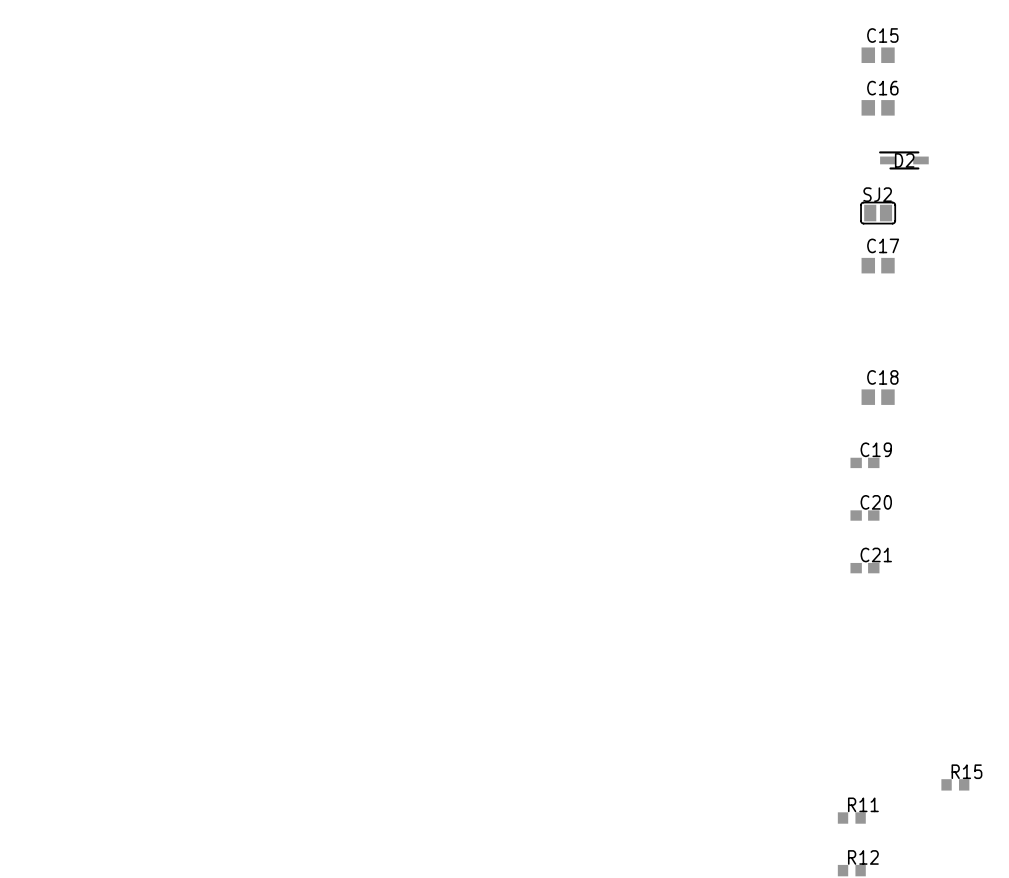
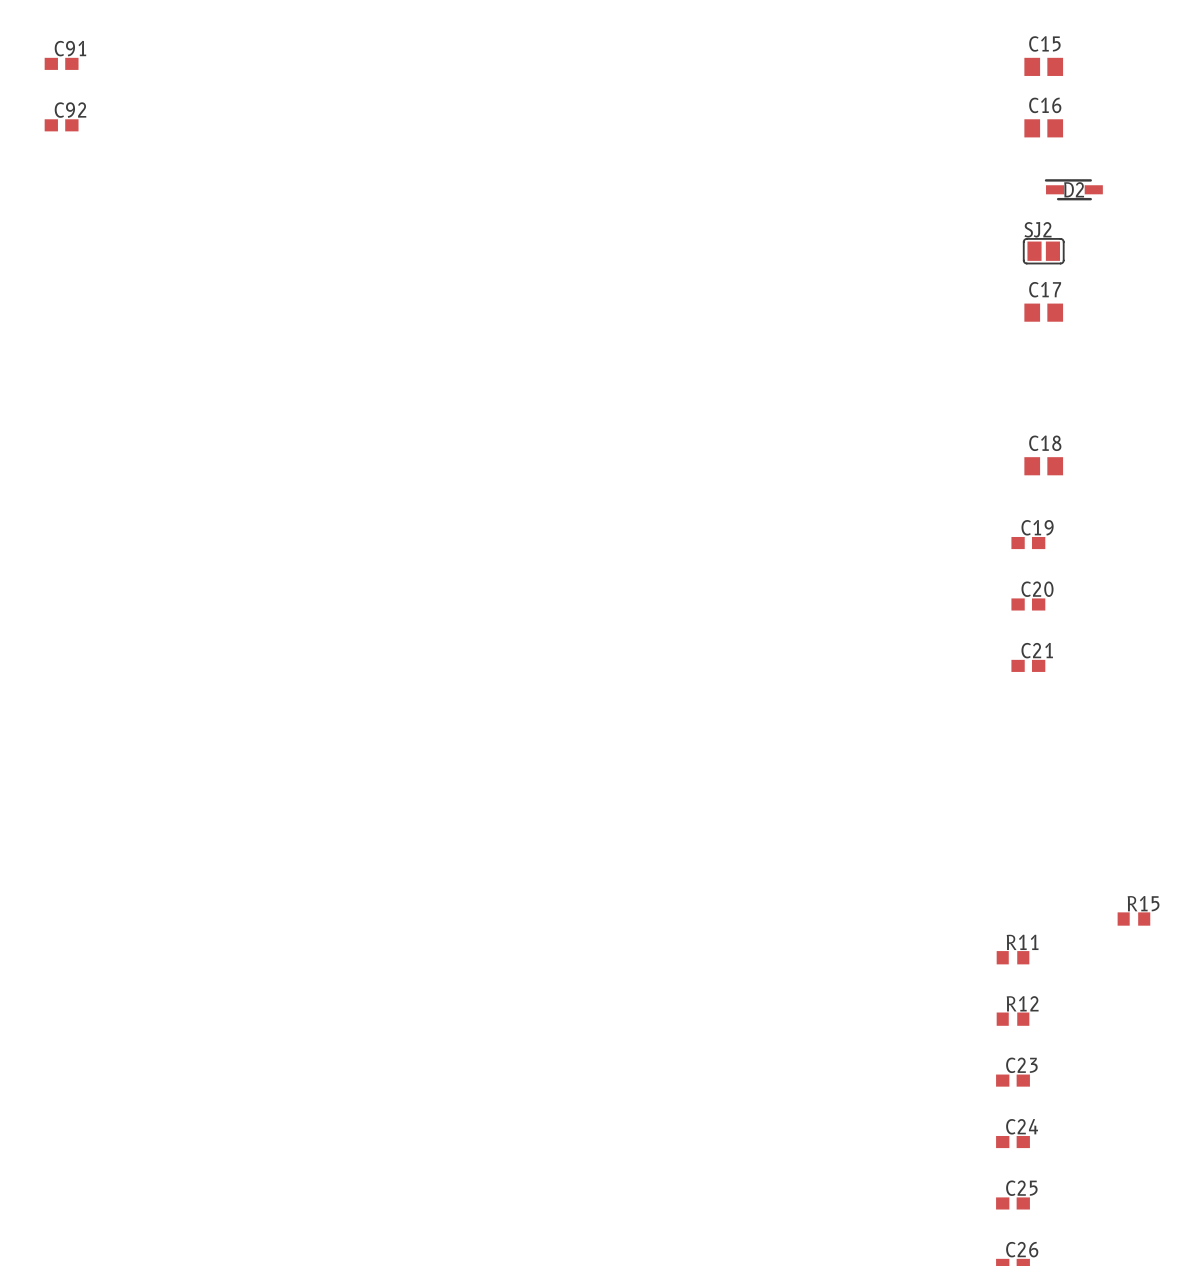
C91: none -> (61, 63)
C92: none -> (61, 125)

